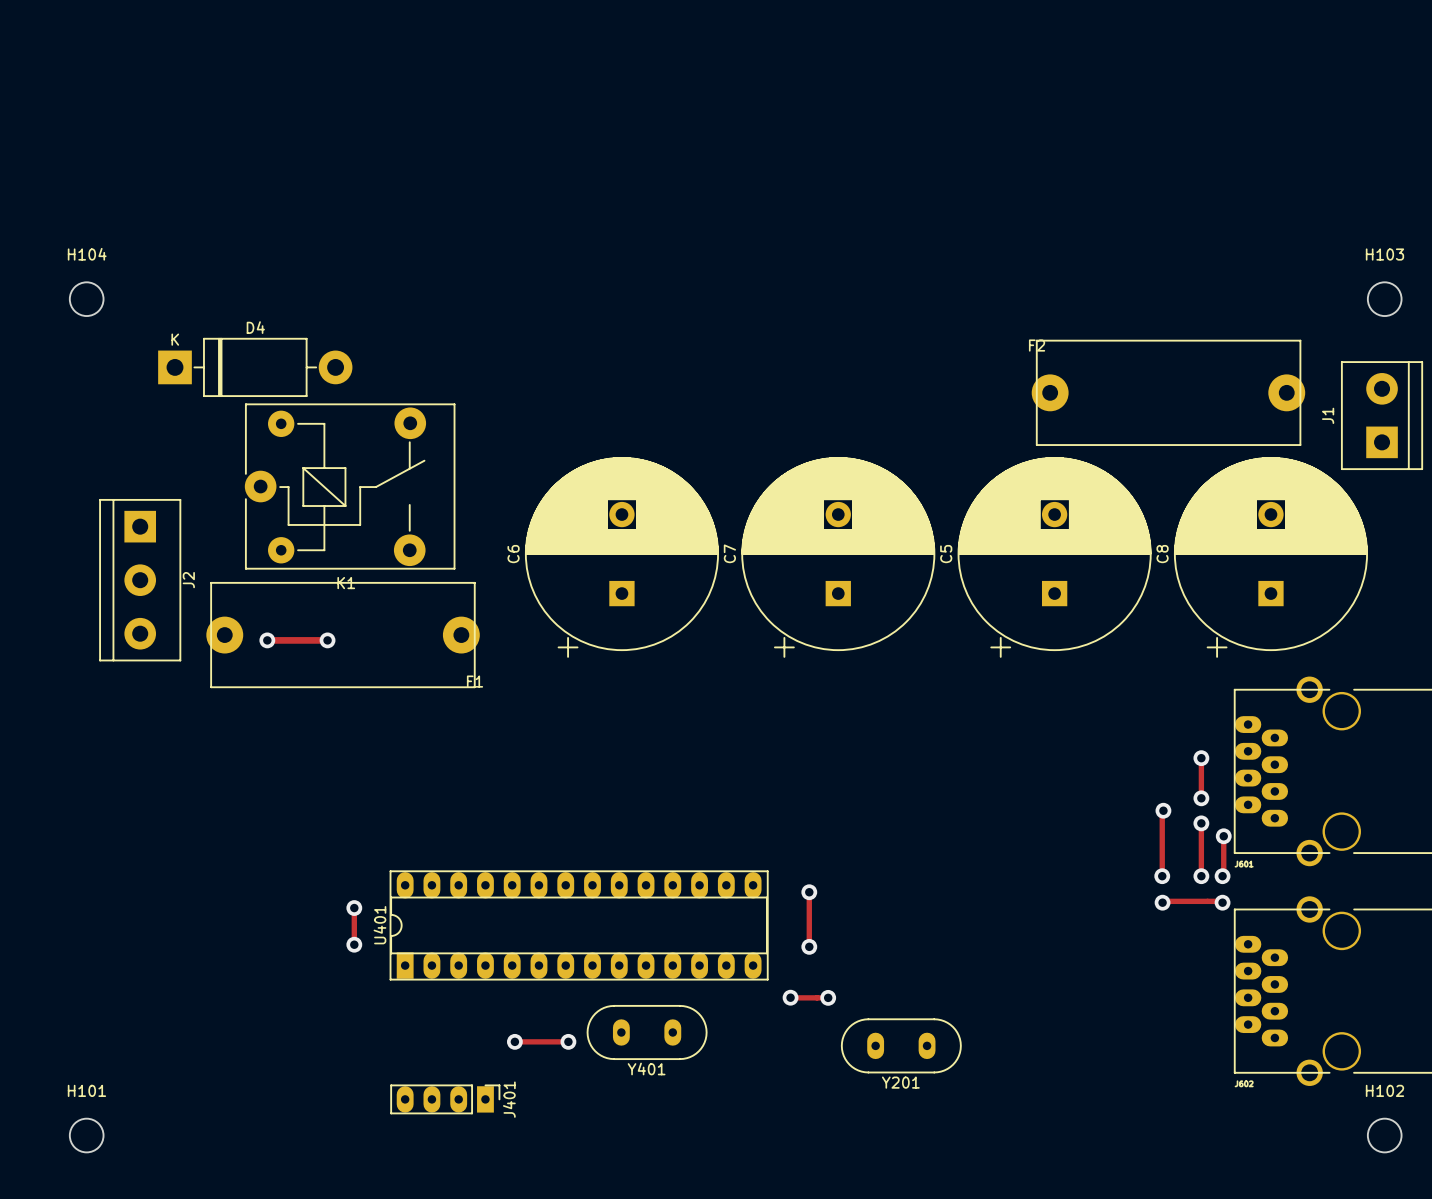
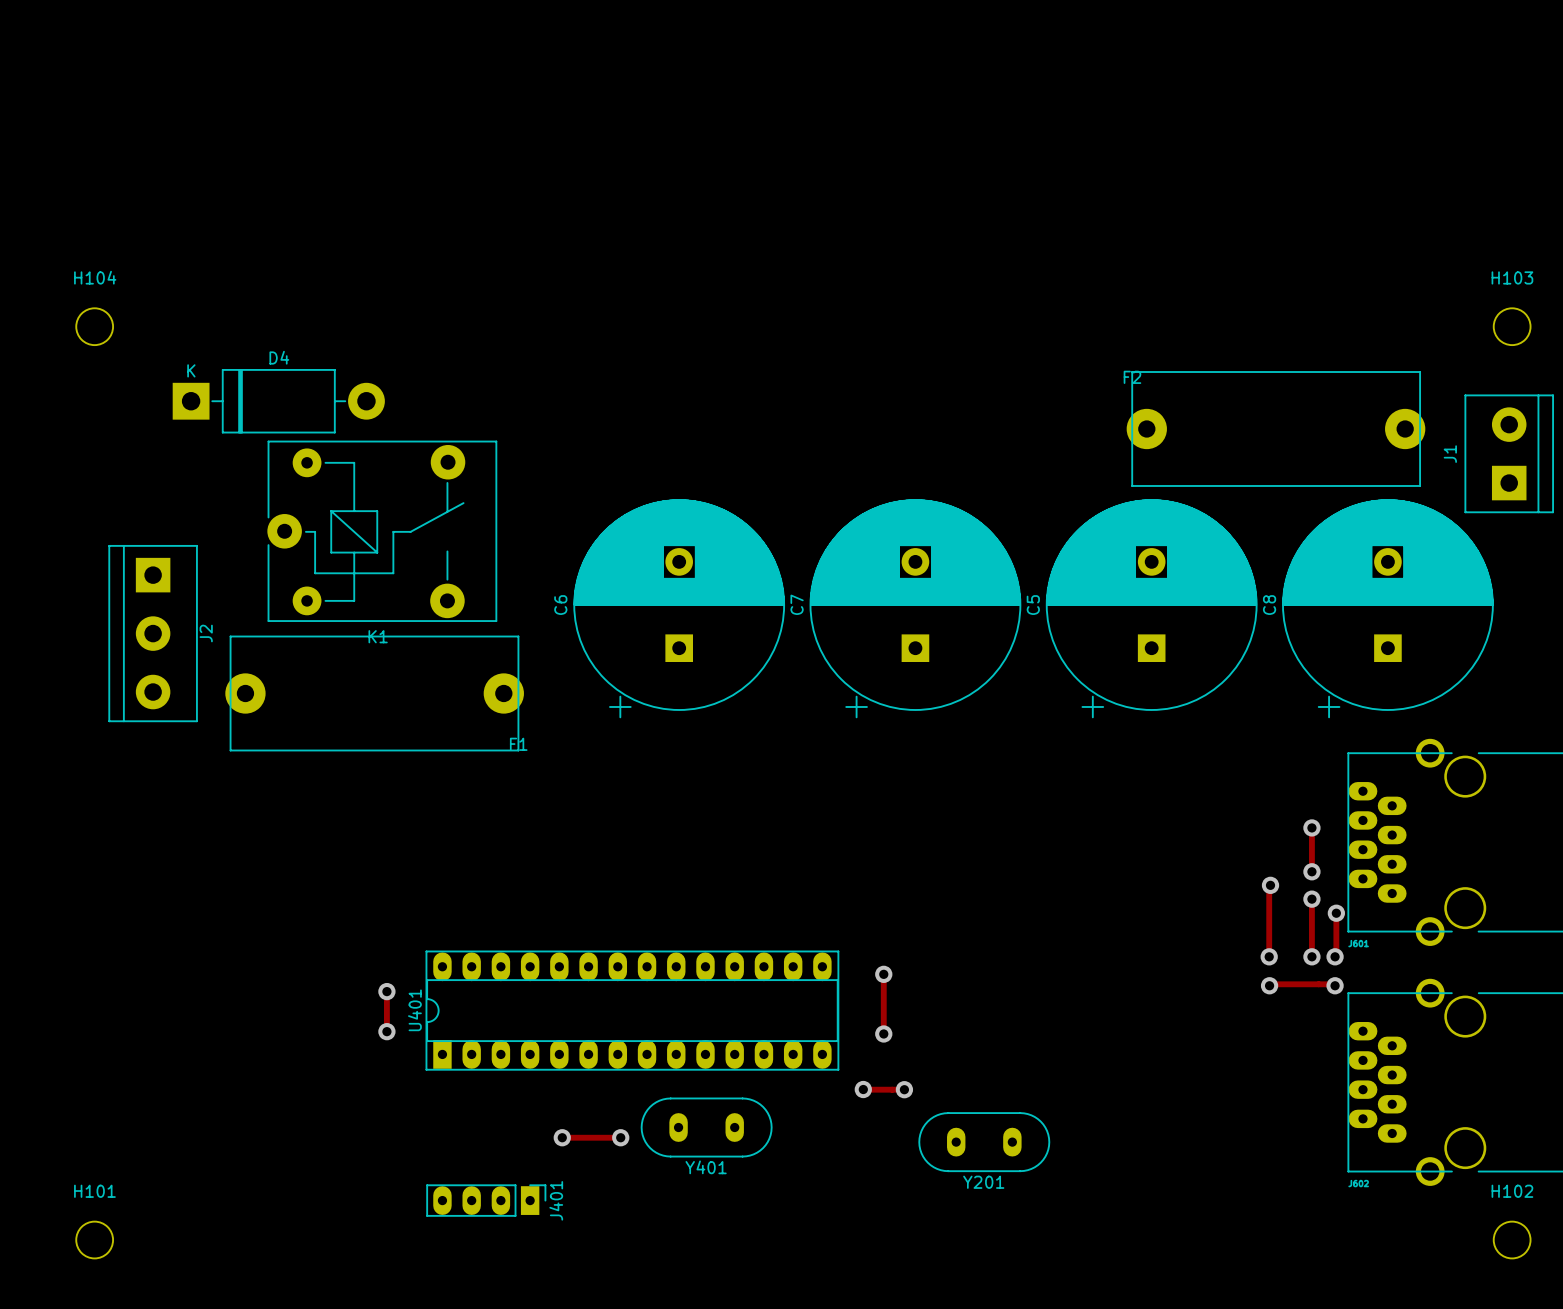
track: (267, 640) (327, 640) -> none
via: (267, 640) -> none
via: (327, 640) -> none

